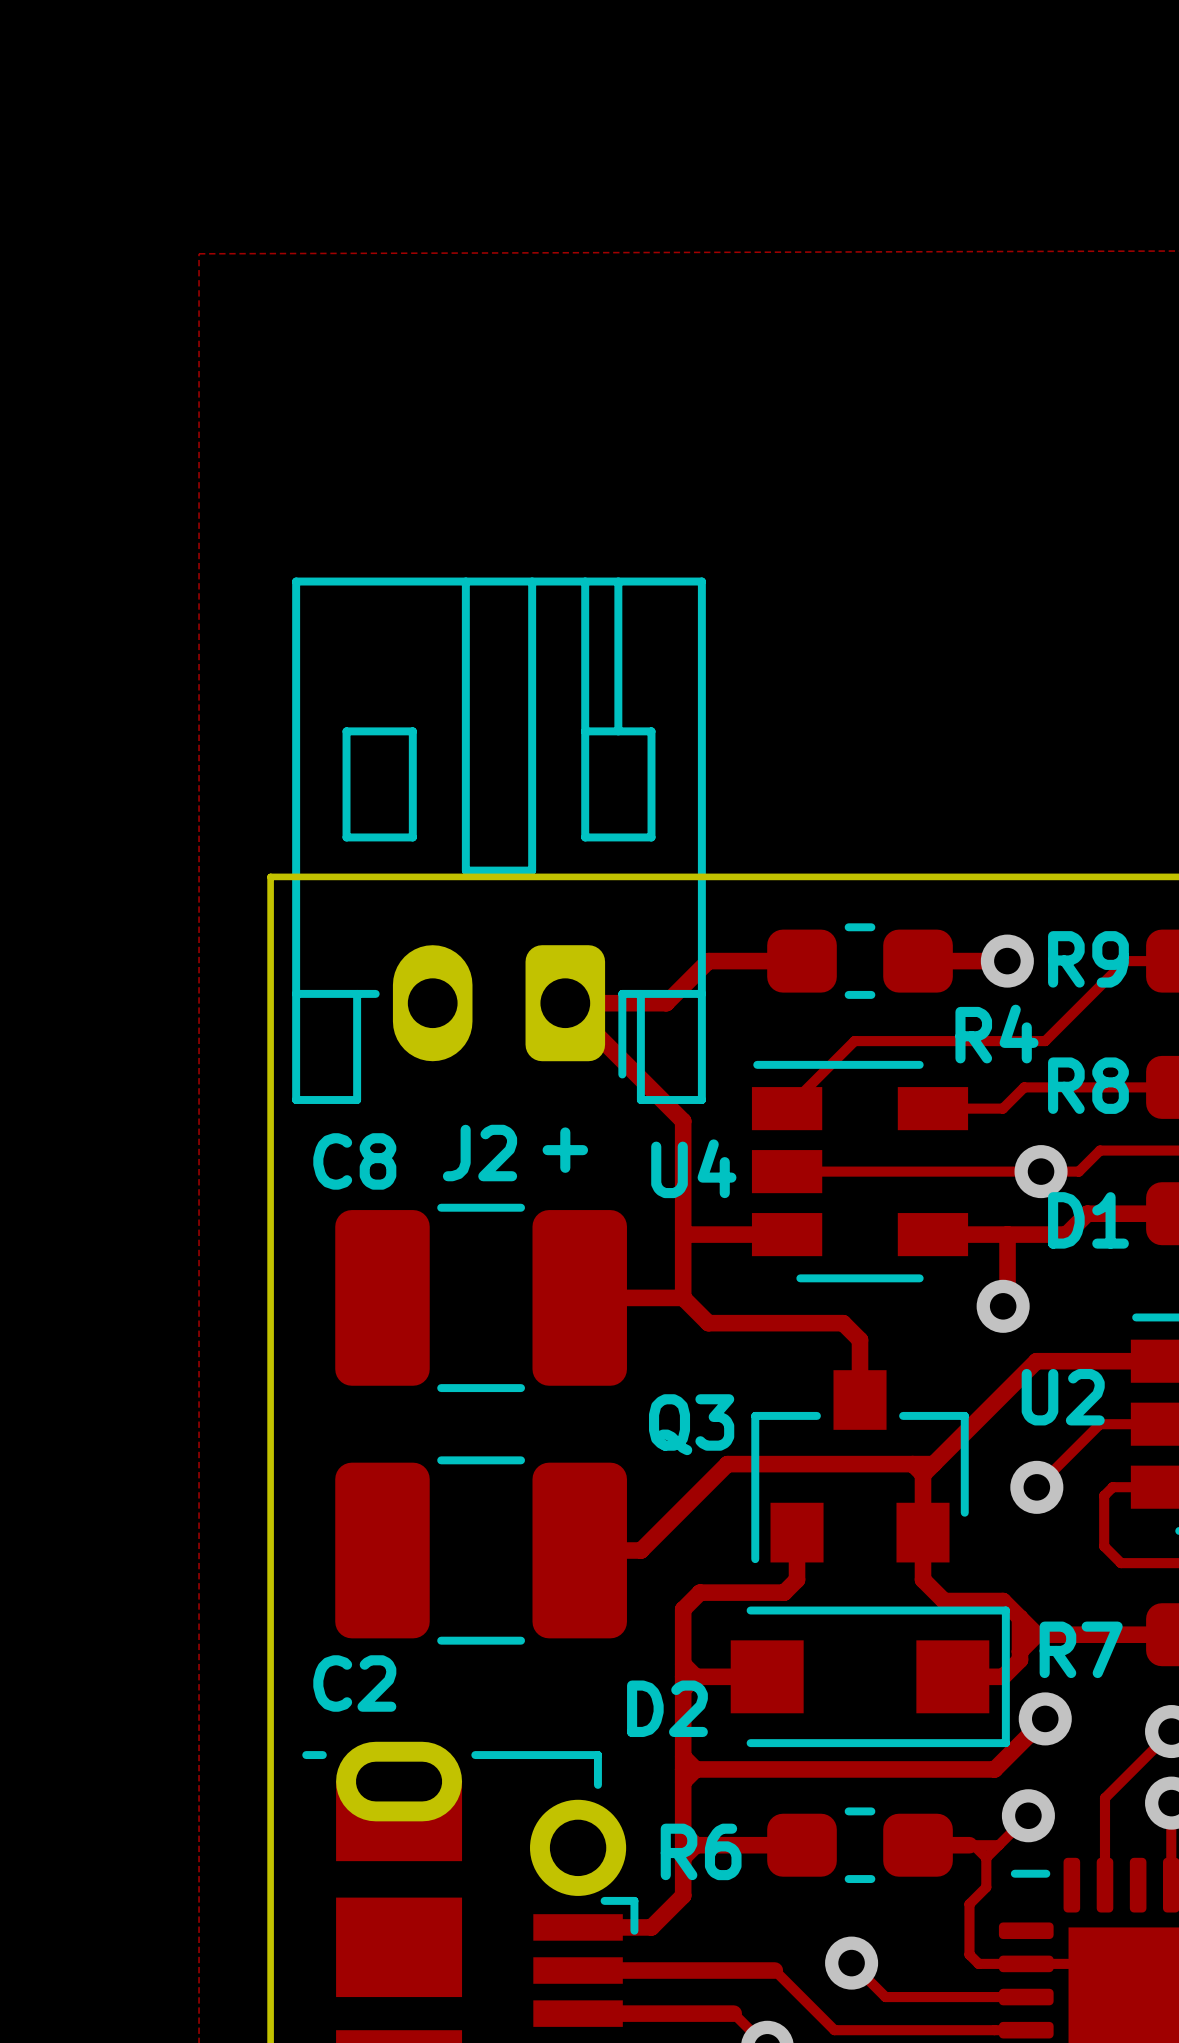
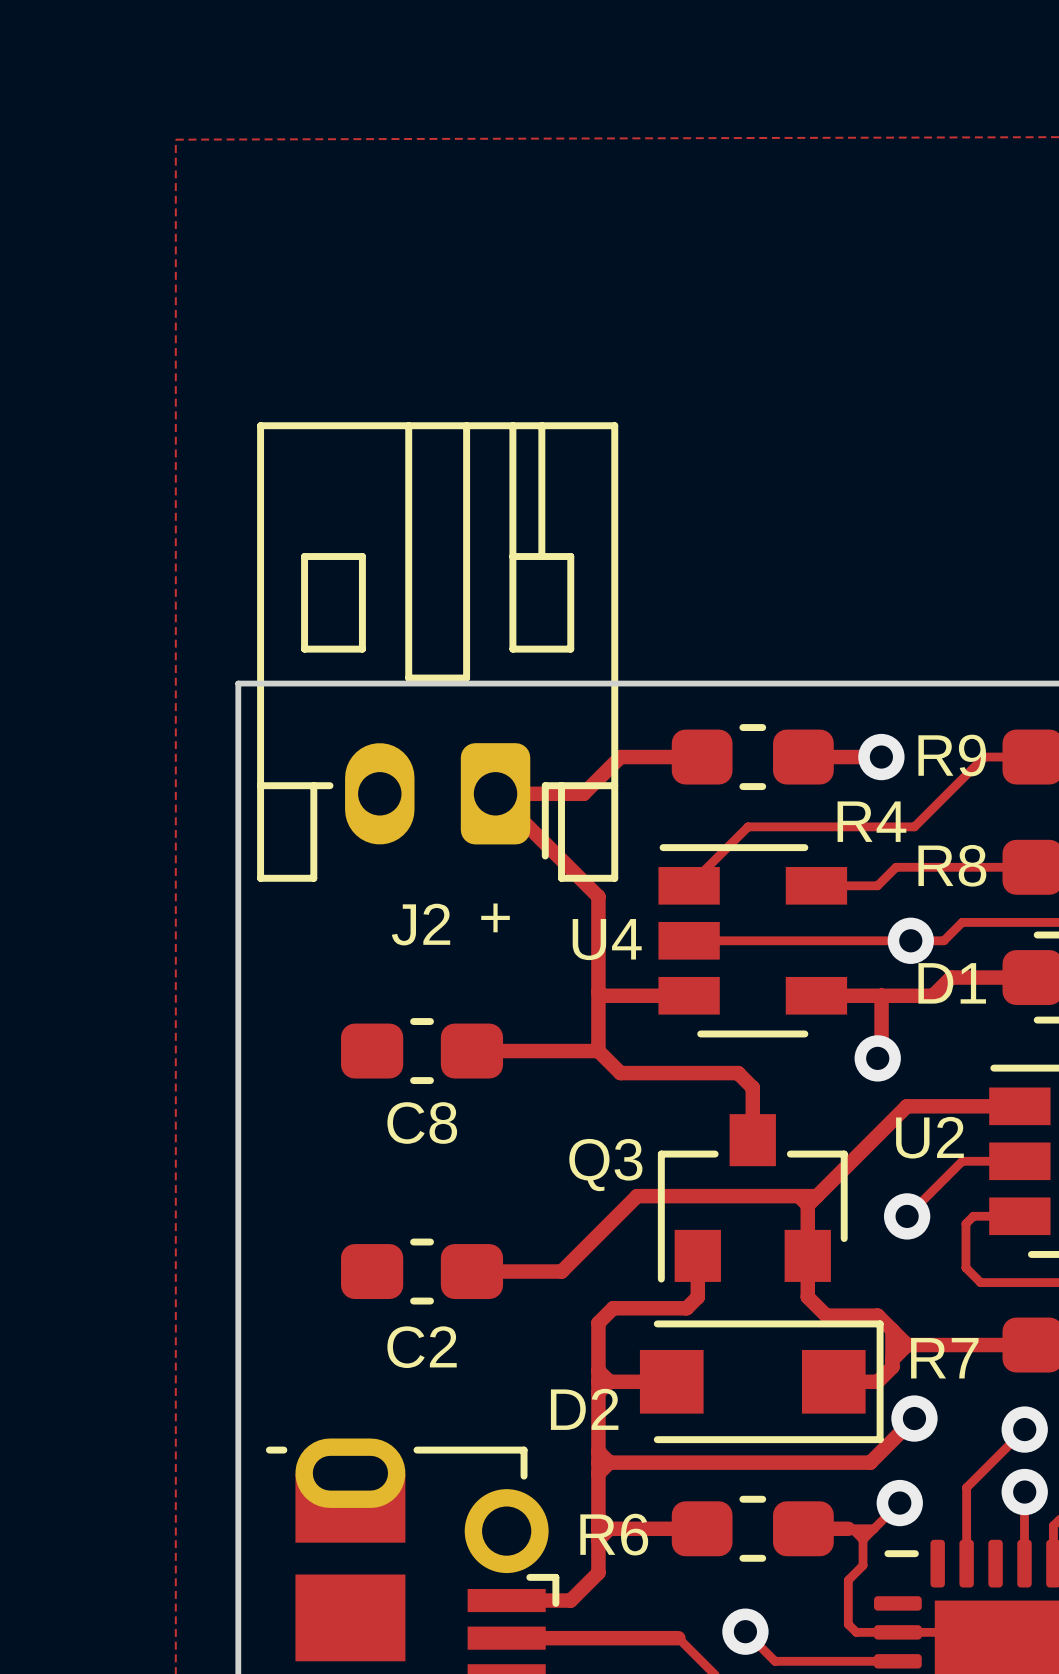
C8 name position: C8 (354, 1161) -> C8 (422, 1123)
C8 footprint: [335, 1203, 627, 1393] -> [341, 1018, 504, 1085]
C2 footprint: [335, 1456, 627, 1645] -> [341, 1238, 504, 1305]
C2 name position: C2 (354, 1683) -> C2 (422, 1347)

